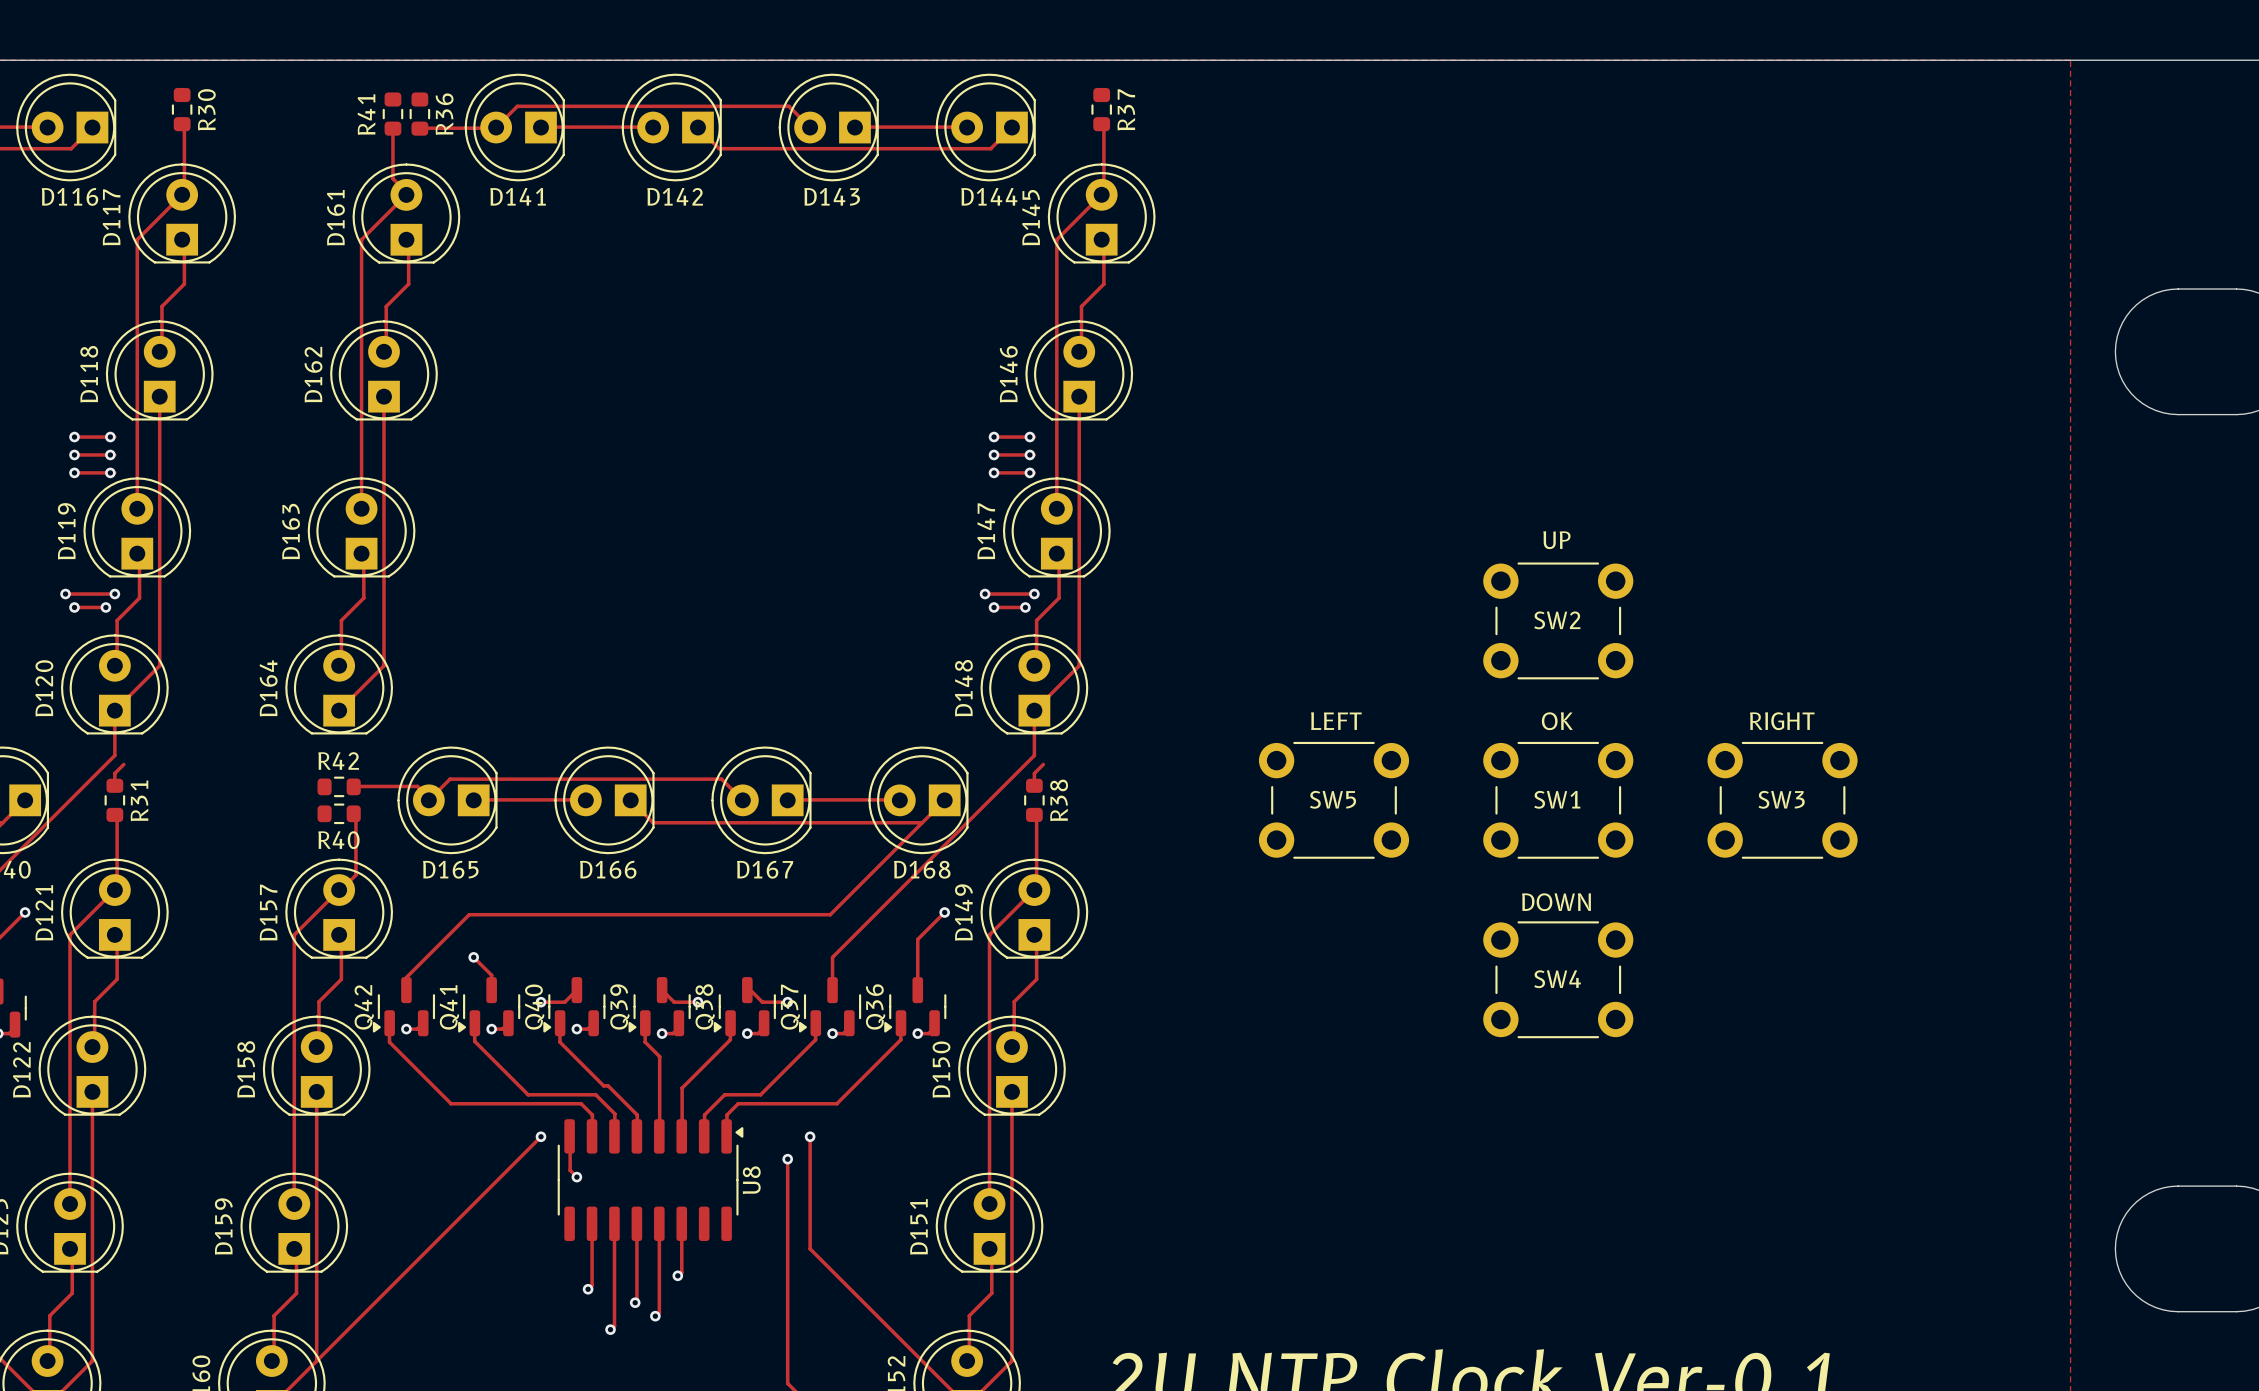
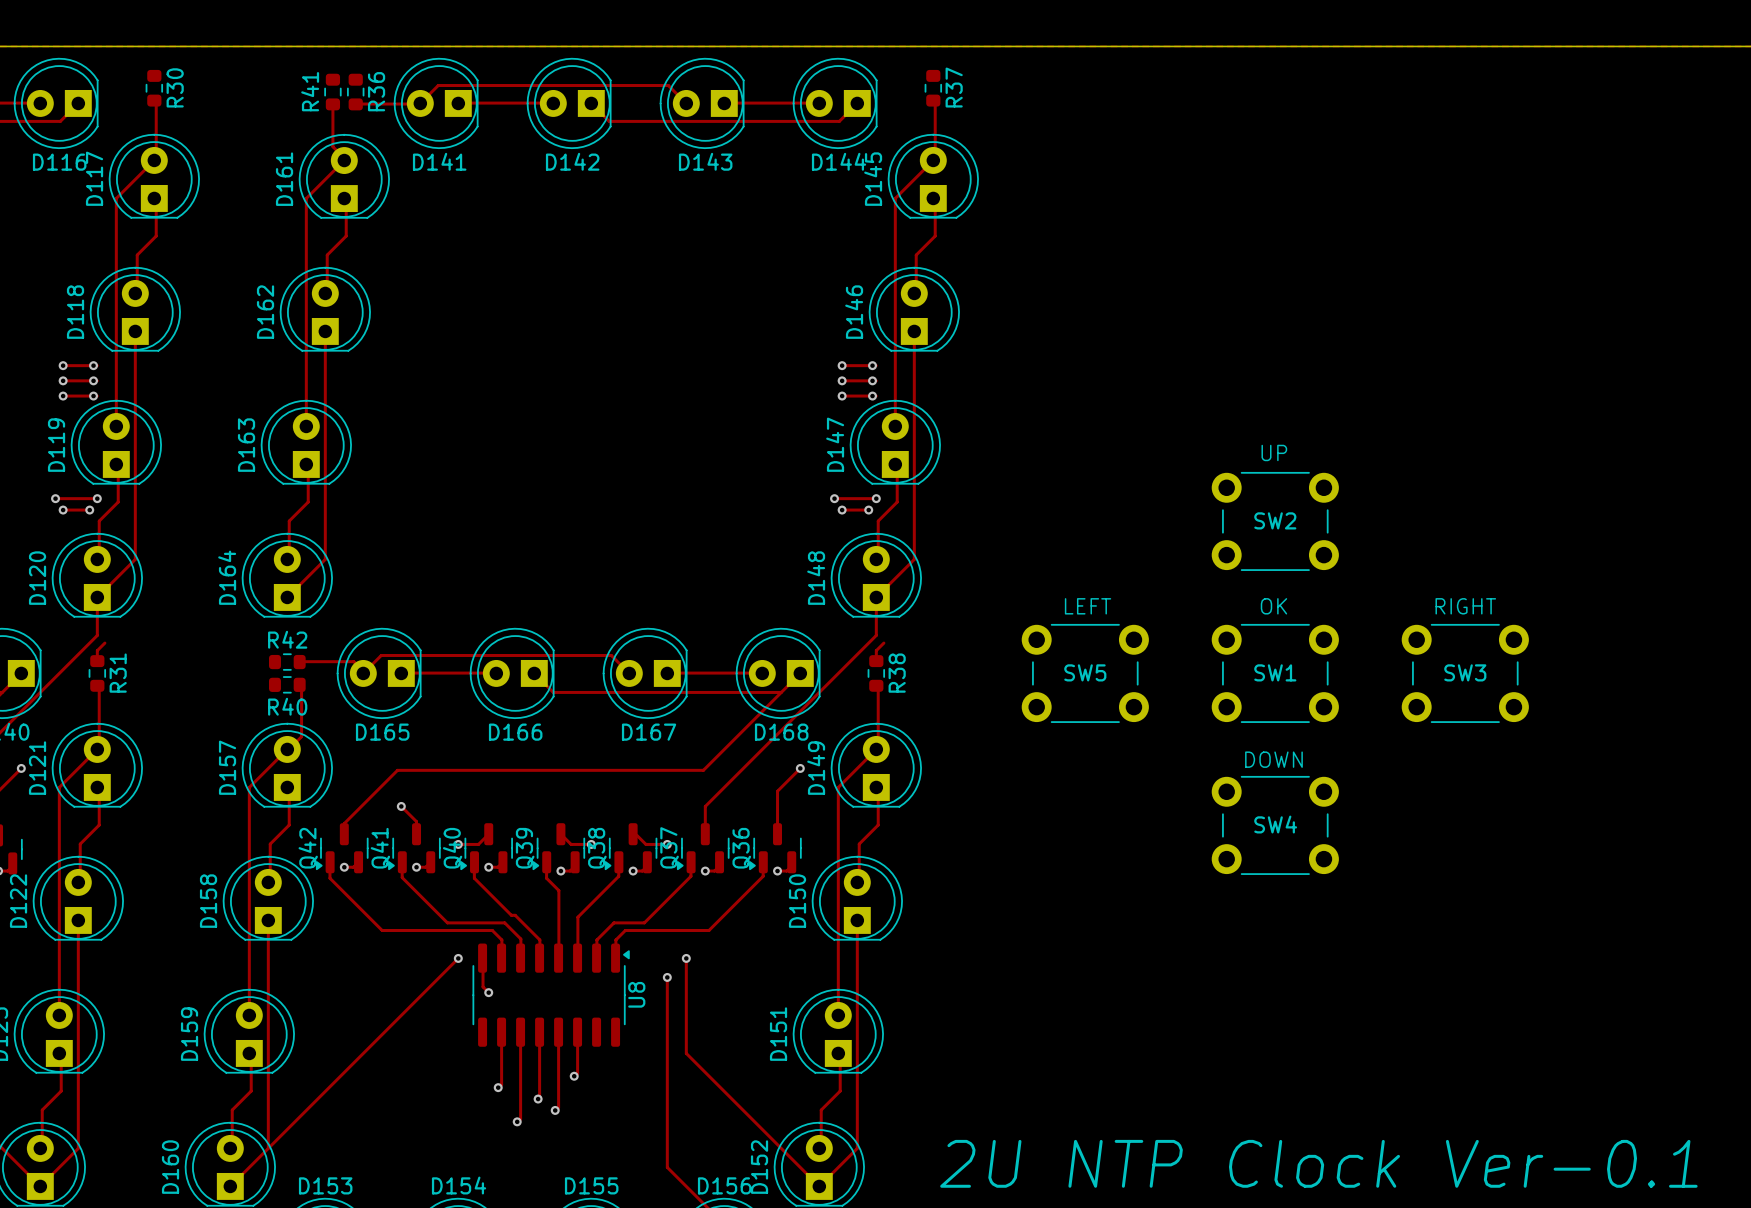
text position: UP (1556, 540) -> UP (1274, 452)
SW2 position: (1558, 620) -> (1275, 521)
text position: LEFT (1336, 721) -> LEFT (1088, 606)
text position: OK (1557, 721) -> OK (1273, 606)
text position: RIGHT (1782, 721) -> RIGHT (1465, 606)
SW5 position: (1334, 800) -> (1085, 673)
SW1 position: (1558, 800) -> (1275, 673)
SW3 position: (1782, 800) -> (1465, 673)
text position: DOWN (1556, 902) -> DOWN (1273, 759)
SW4 position: (1558, 979) -> (1275, 825)

